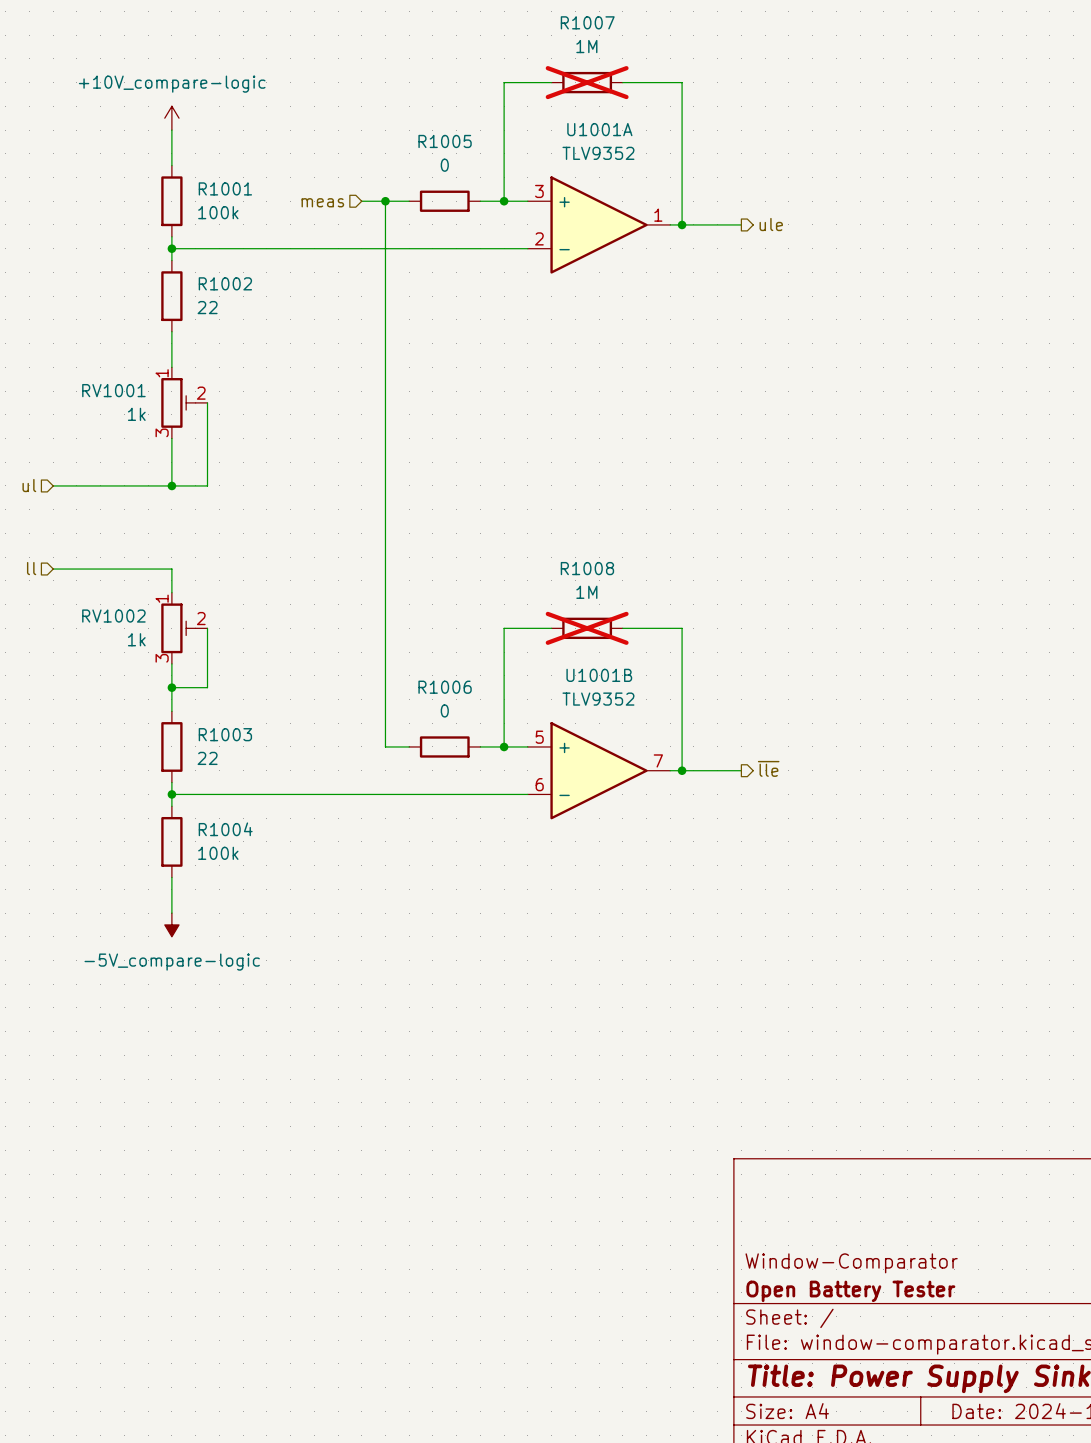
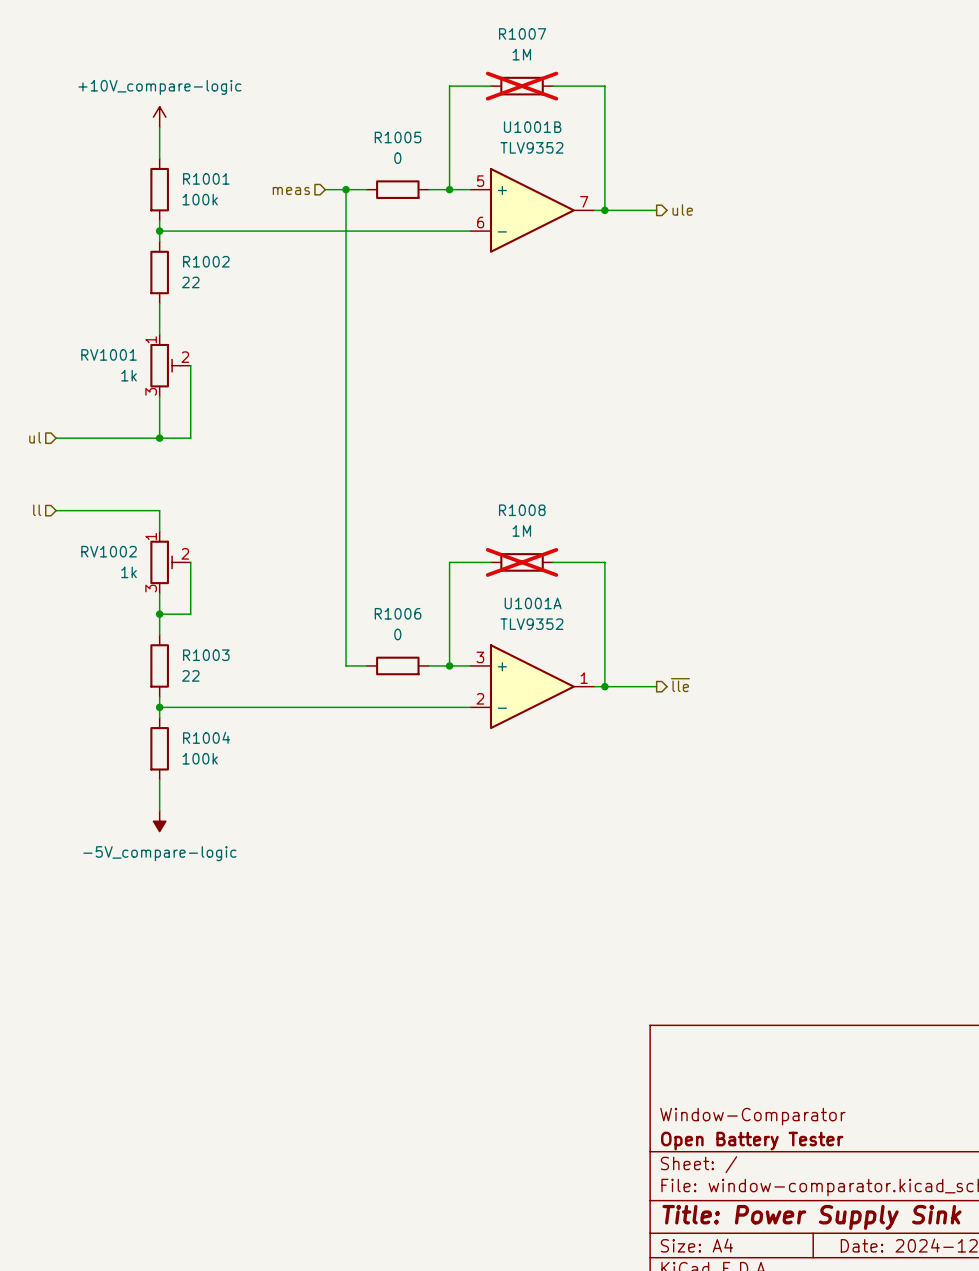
U1001A position: (599, 224) -> (532, 686)
U1001B position: (599, 770) -> (532, 210)

